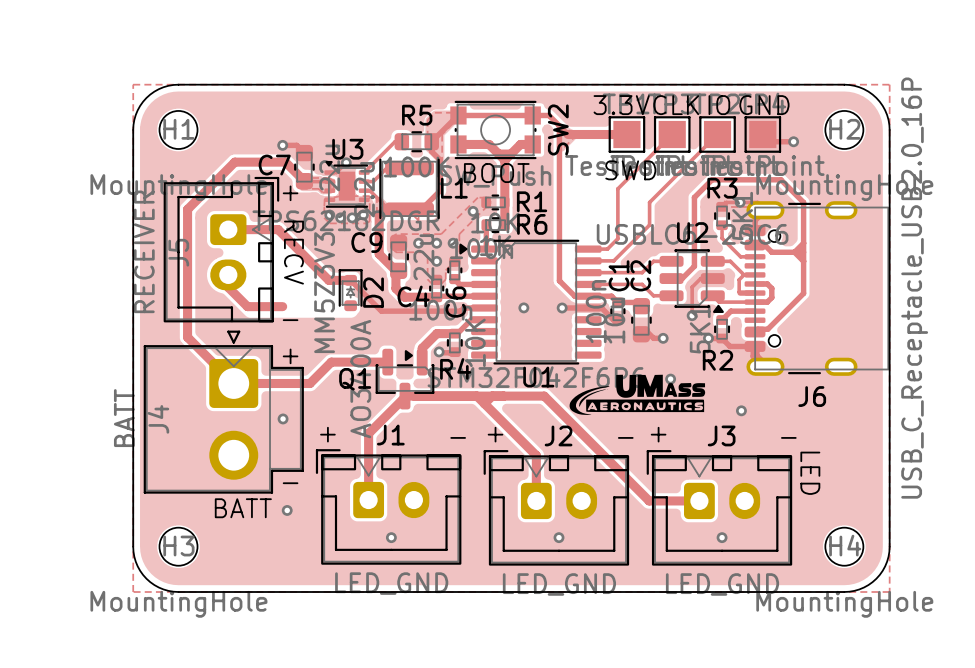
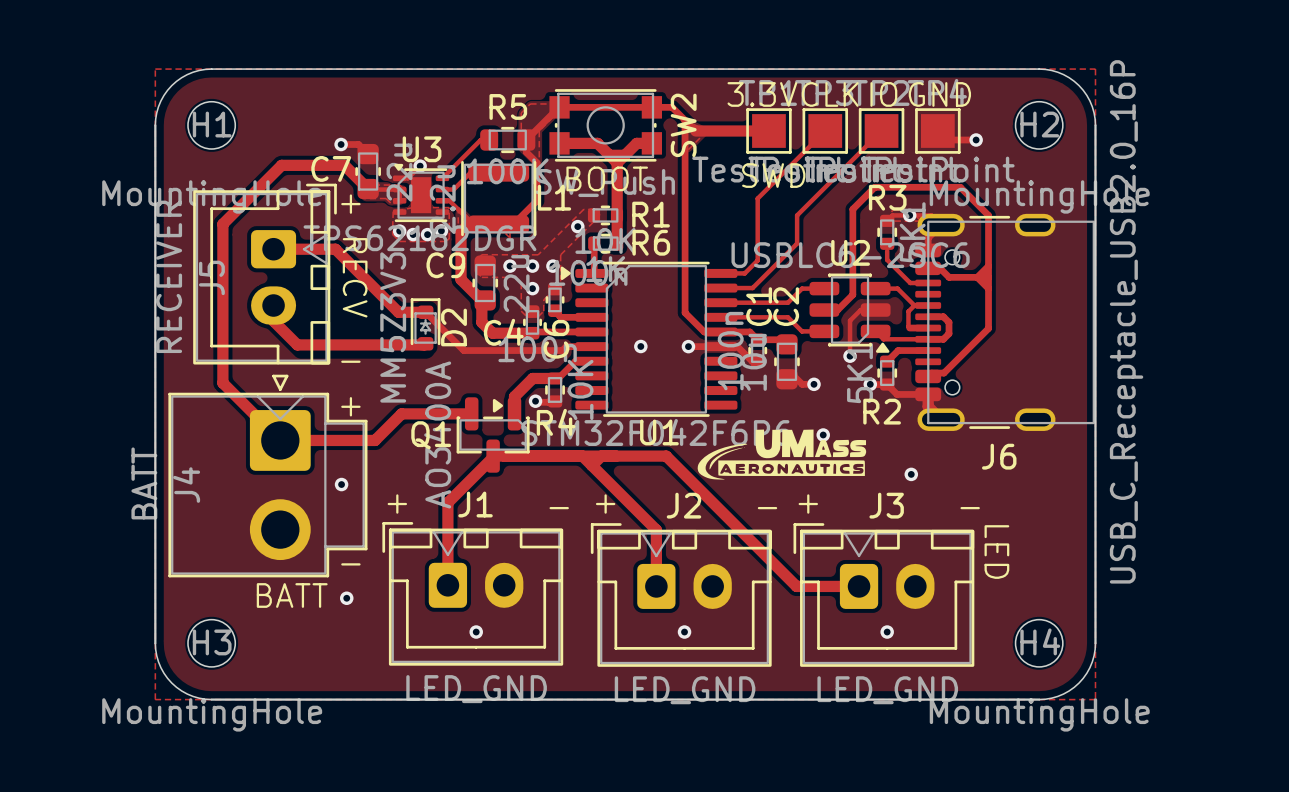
track: none -> (425, 343) (341, 344)

